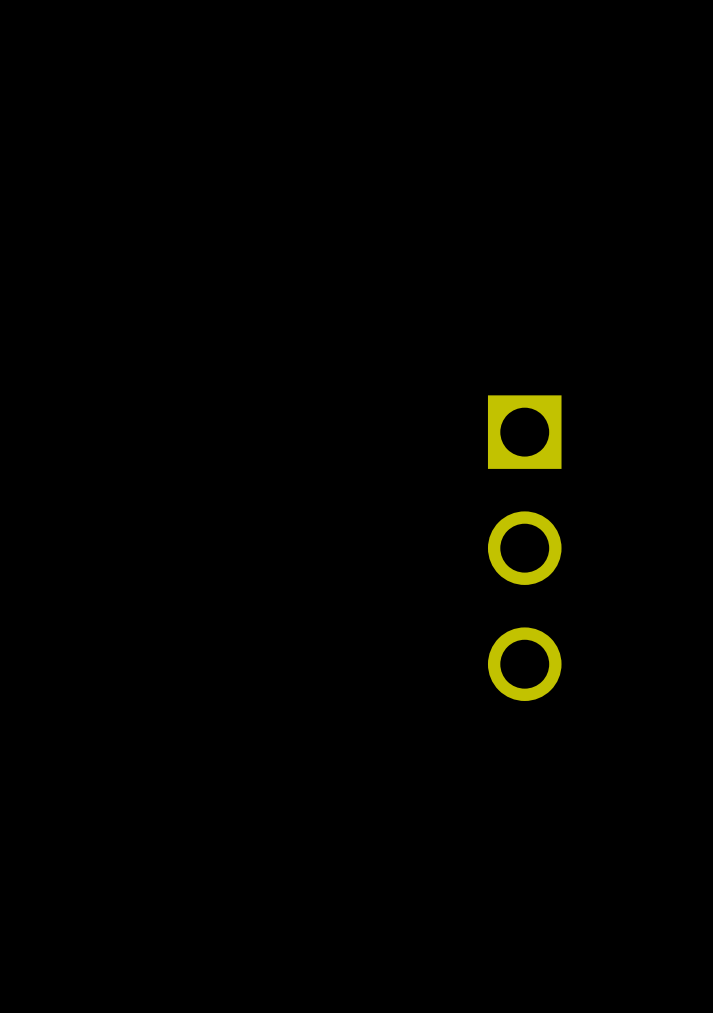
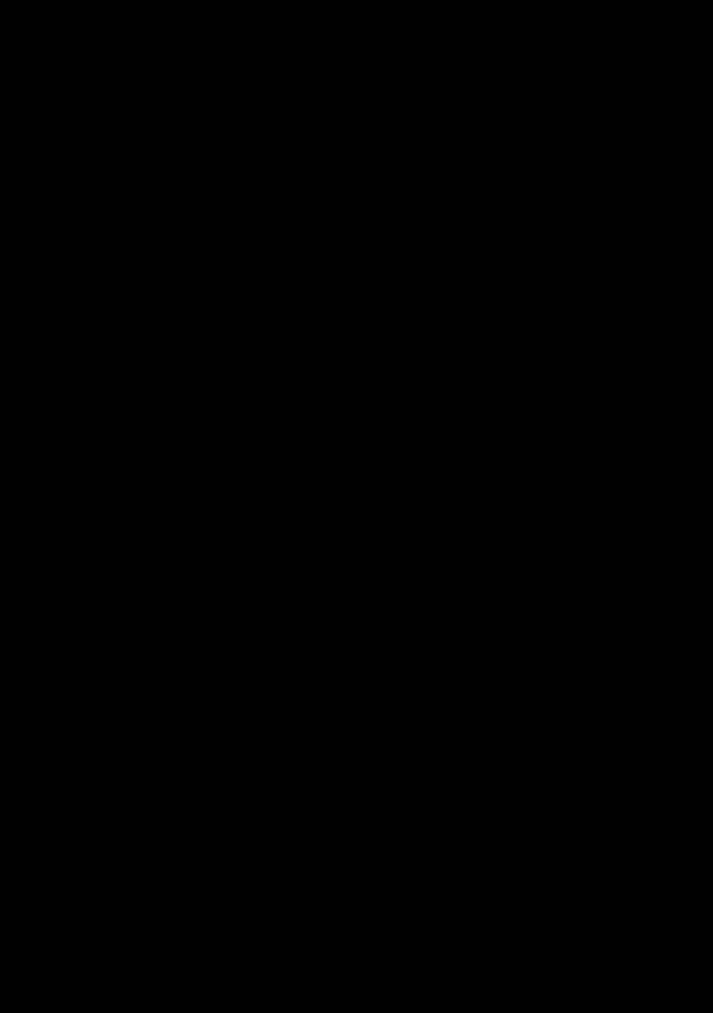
part: (524, 548) -> none

